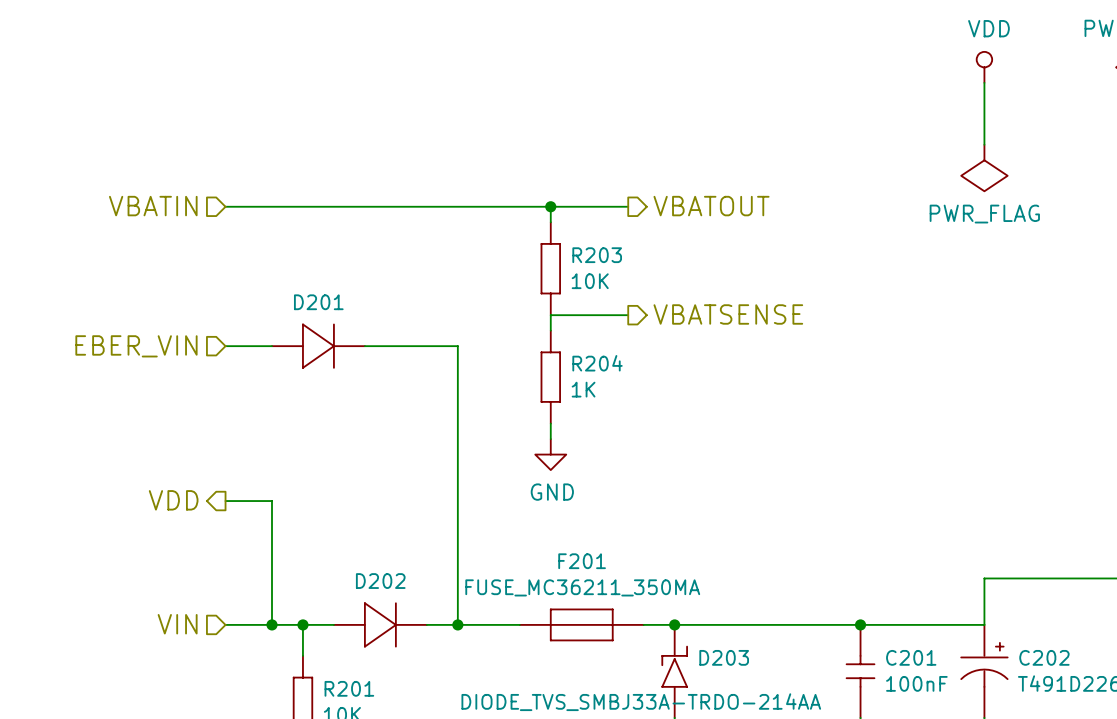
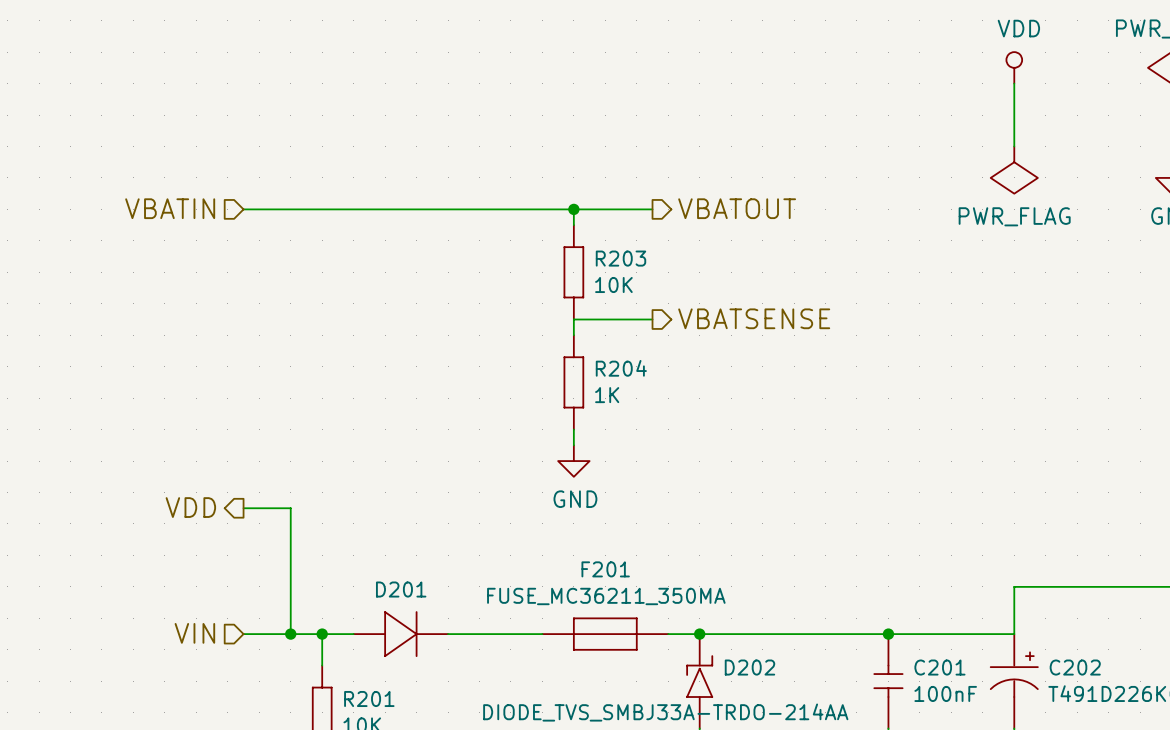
hierarchical label: EBER_VIN (136, 346) -> none
wire: (225, 346) (272, 346) -> none
D201: (318, 346) -> none
wire: (364, 346) (457, 346) (457, 624) -> none
D202 name: D202 (380, 581) -> D201 (401, 589)
junction: (457, 624) -> none
D203 name: D203 (724, 657) -> D202 (749, 667)

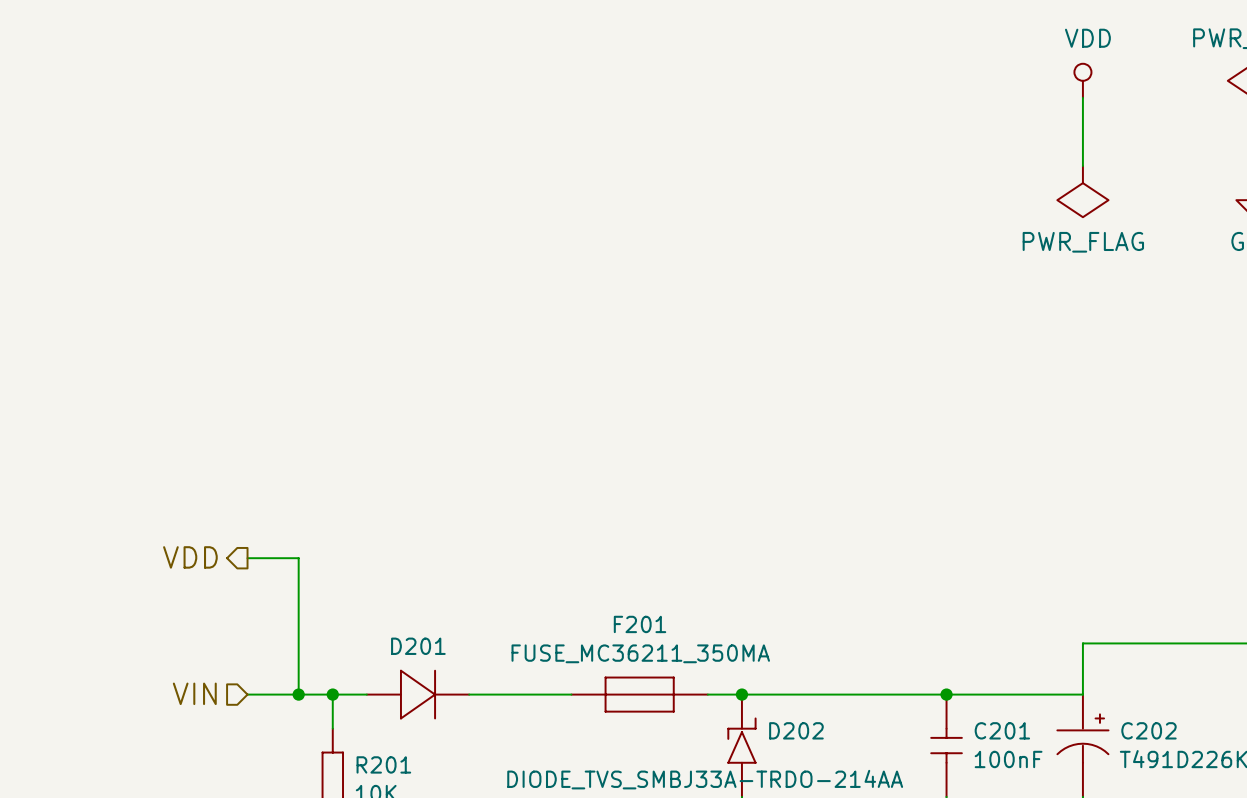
hierarchical label: VBATIN (170, 208) -> none
hierarchical label: VBATOUT (737, 208) -> none
wire: (243, 209) (652, 209) -> none
wire: (573, 209) (573, 225) -> none
junction: (573, 209) -> none
R203: 10K (573, 272) -> none
hierarchical label: VBATSENSE (754, 318) -> none
wire: (652, 319) (573, 319) (573, 335) -> none
R204: 1K (573, 382) -> none
wire: (573, 429) (573, 445) -> none
power symbol: GND (573, 461) -> none

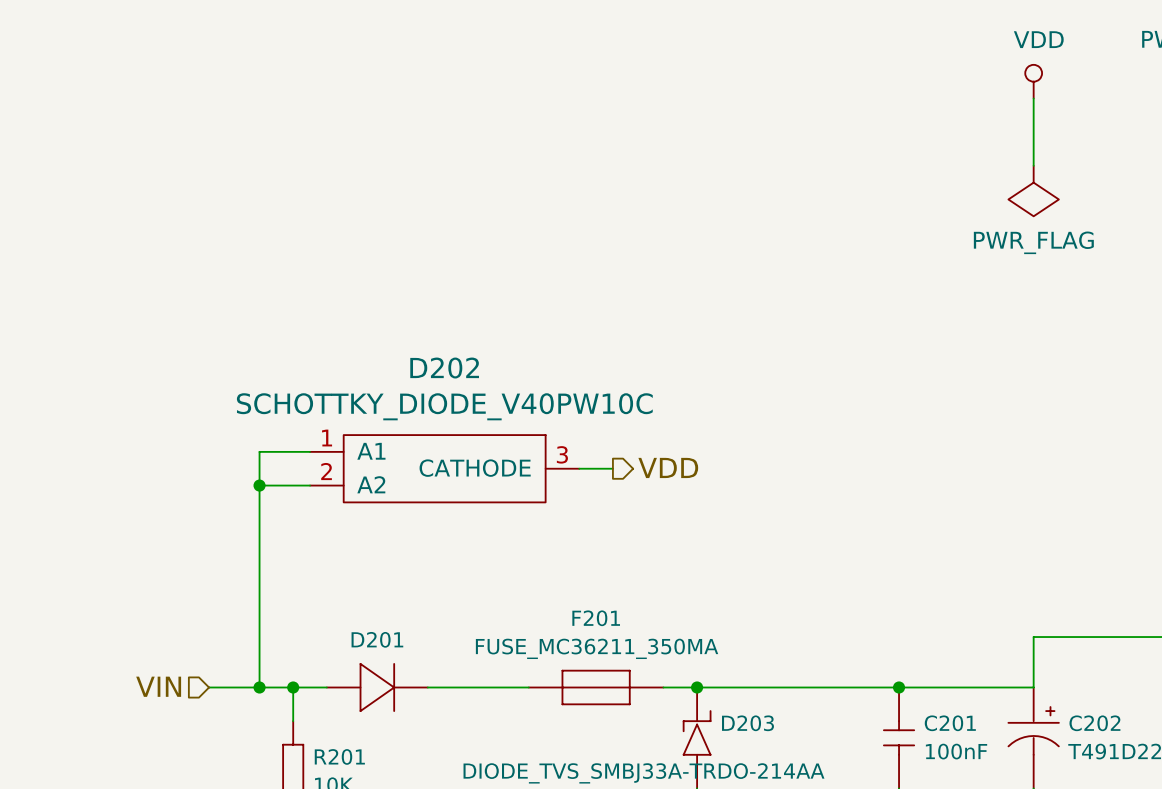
D202: none -> SCHOTTKY_DIODE_V40PW10C (444, 468)
wire: none -> (579, 468) (612, 468)
hierarchical label: none -> VDD (668, 467)
wire: none -> (259, 485) (310, 485)
junction: none -> (259, 485)
hierarchical label: VDD (190, 557) -> none
wire: (247, 558) (298, 558) -> (310, 451) (259, 451) (259, 552)
D202 name: D202 (796, 730) -> D203 (747, 723)

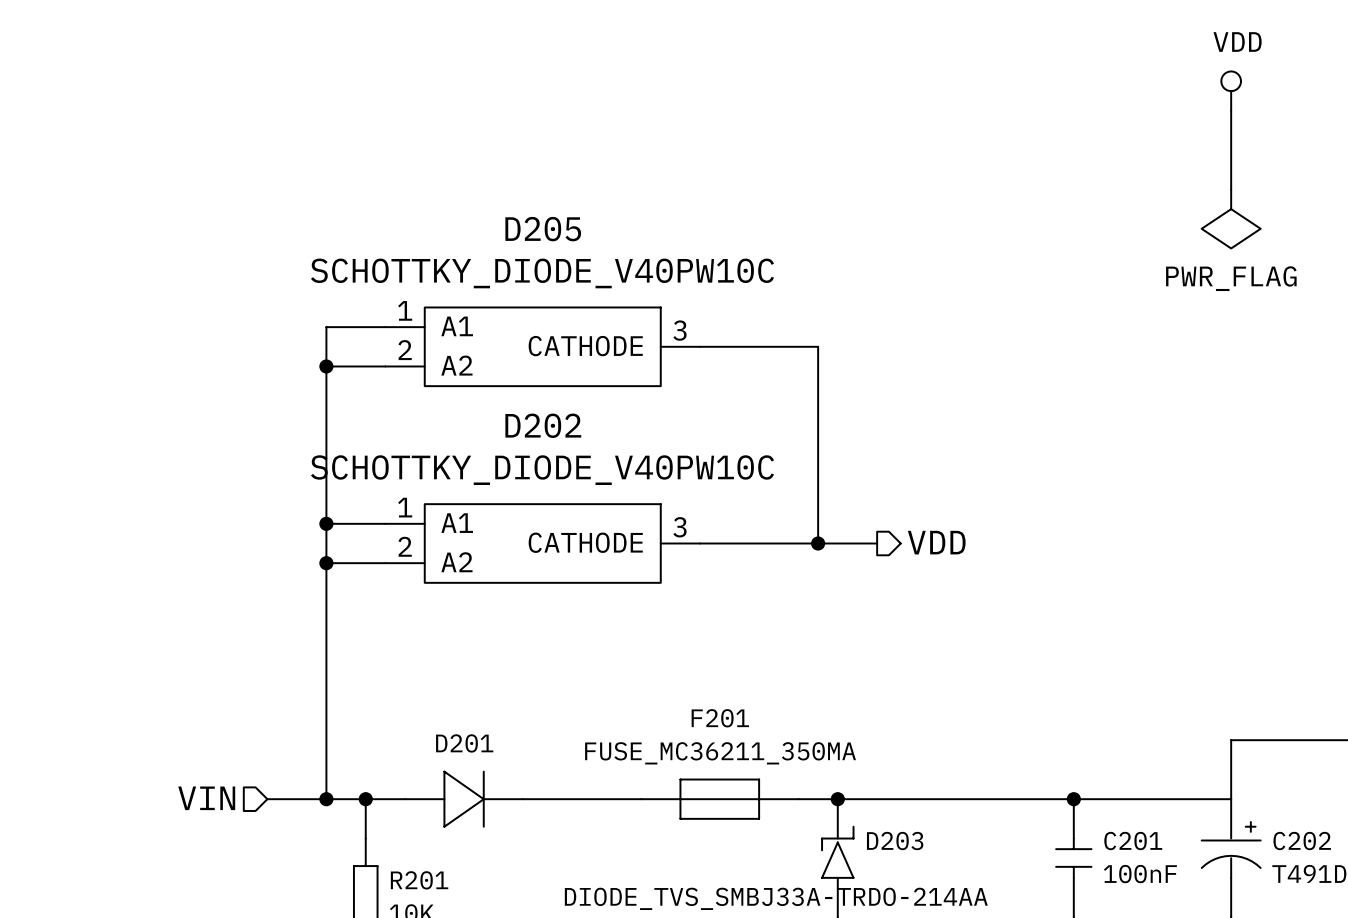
wire: none -> (385, 327) (326, 327) (326, 523)
D205: none -> SCHOTTKY_DIODE_V40PW10C (542, 346)
wire: none -> (700, 346) (818, 346) (818, 543)
wire: none -> (326, 366) (385, 366)
junction: none -> (326, 366)
junction: none -> (326, 523)
hierarchical label position: VDD (668, 467) -> VDD (936, 542)
wire: none -> (739, 543) (877, 543)
junction: none -> (818, 543)

